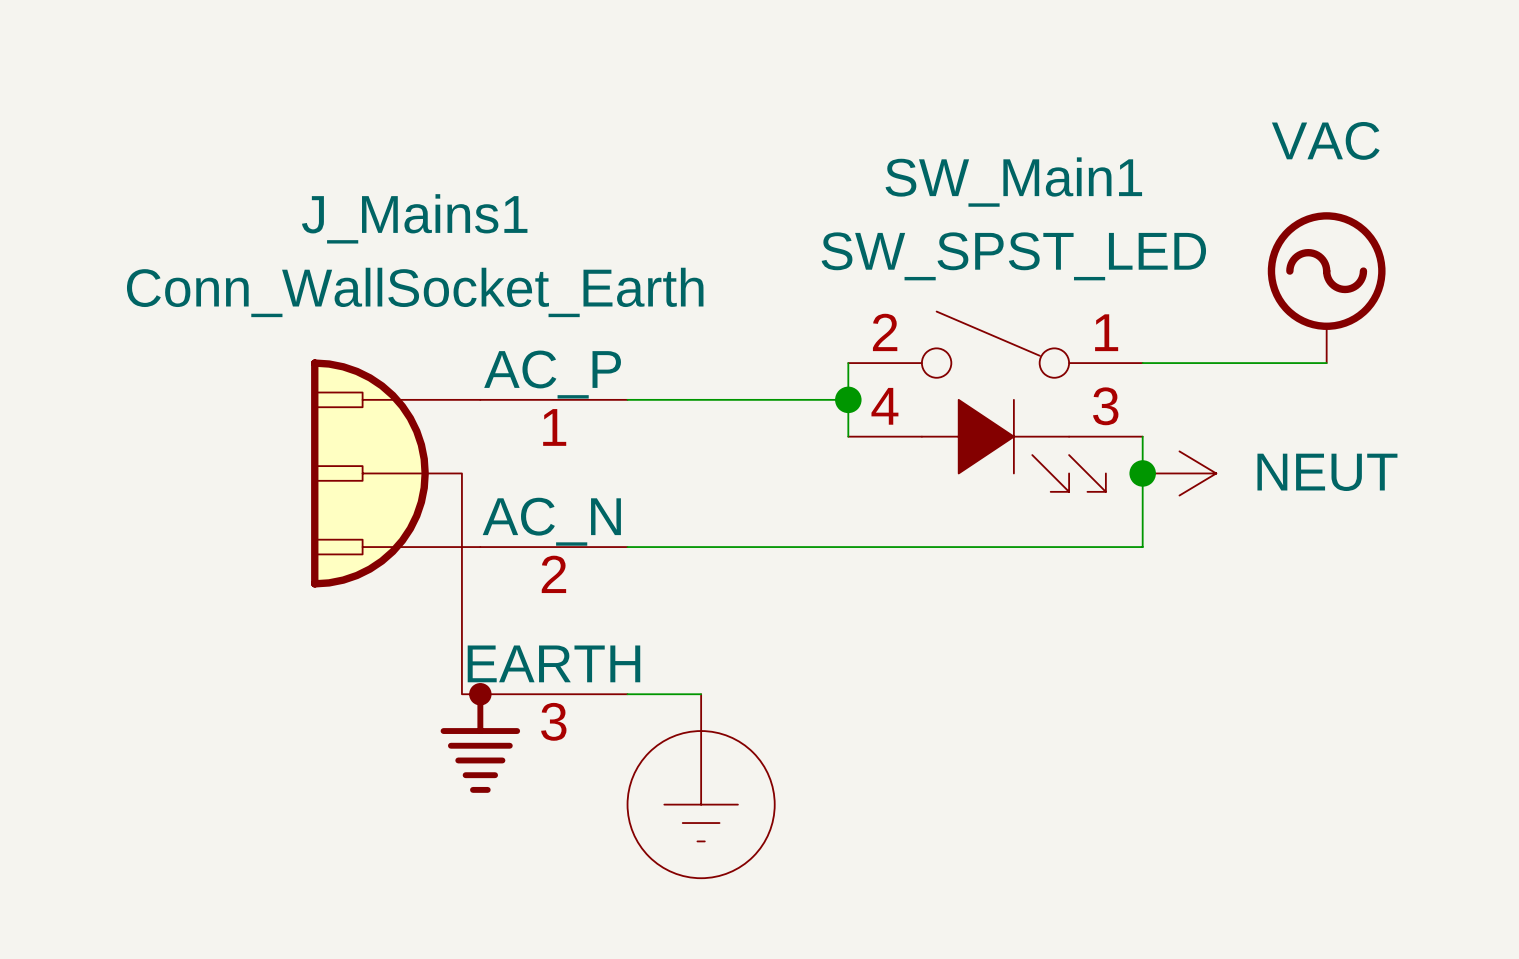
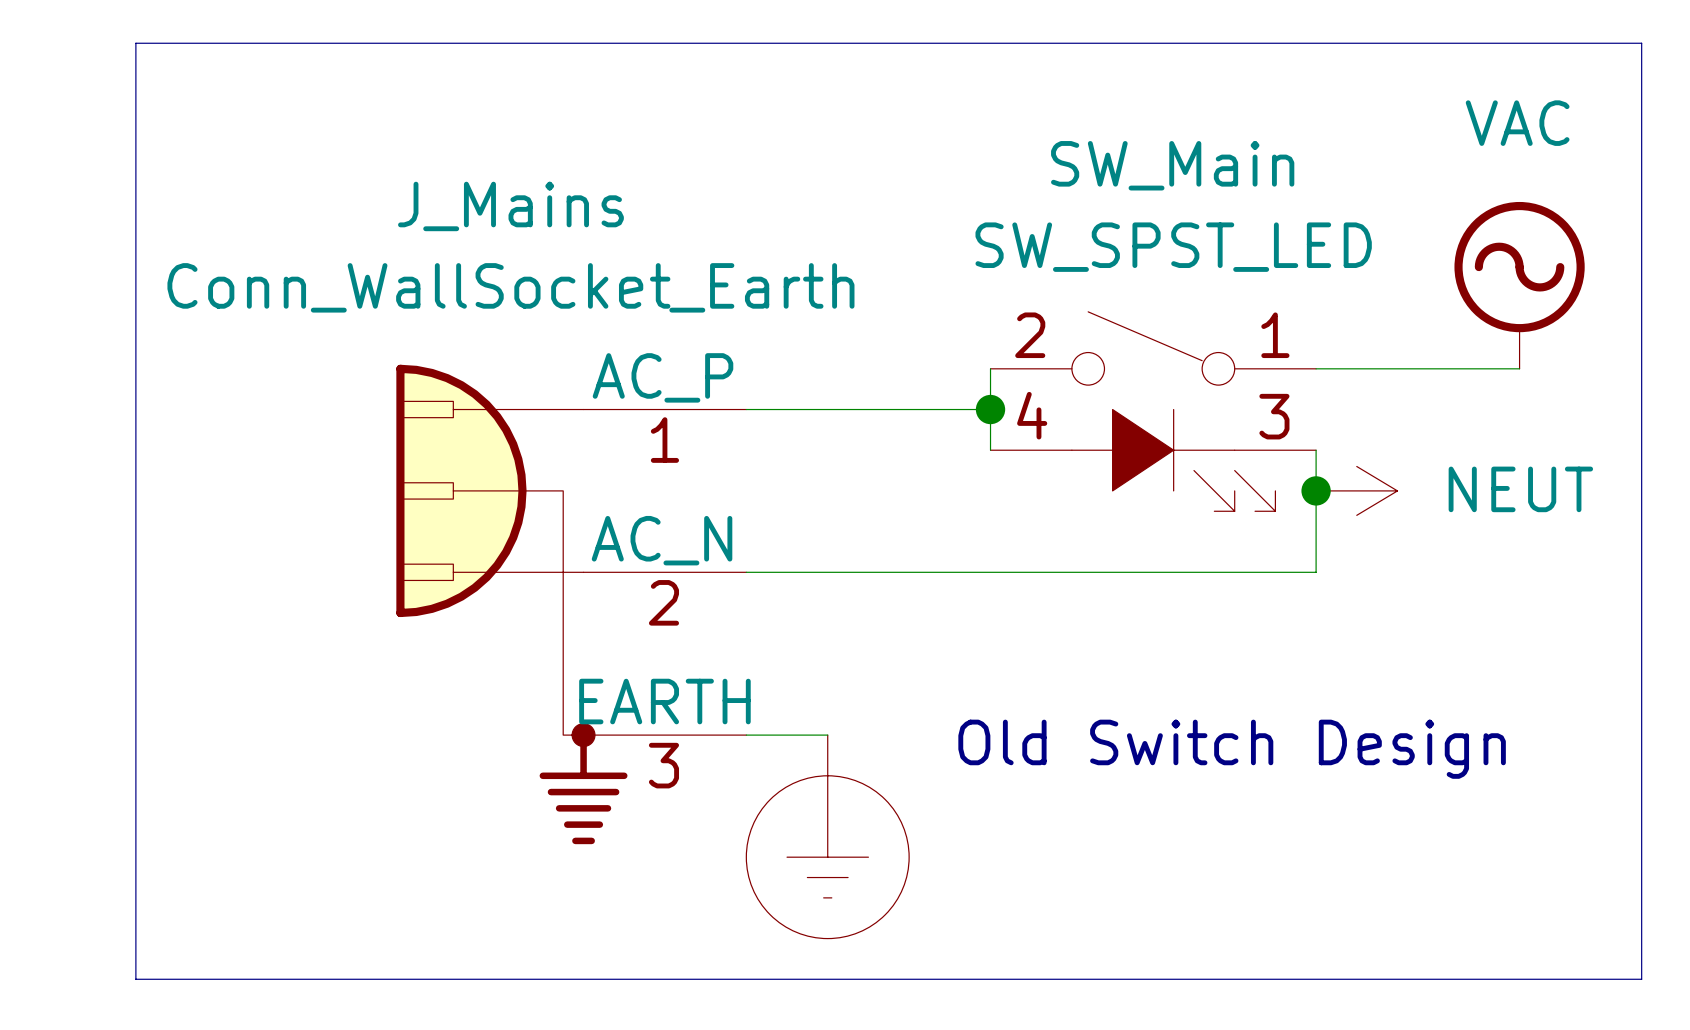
line: none -> (135, 43) (1641, 43) (1641, 979) (135, 979) (135, 43)
SW_Main1 name: SW_Main1 (1013, 182) -> SW_Main (1172, 165)
J_Mains1 name: J_Mains1 (414, 218) -> J_Mains (510, 206)
text: none -> Old Switch Design (1232, 749)

